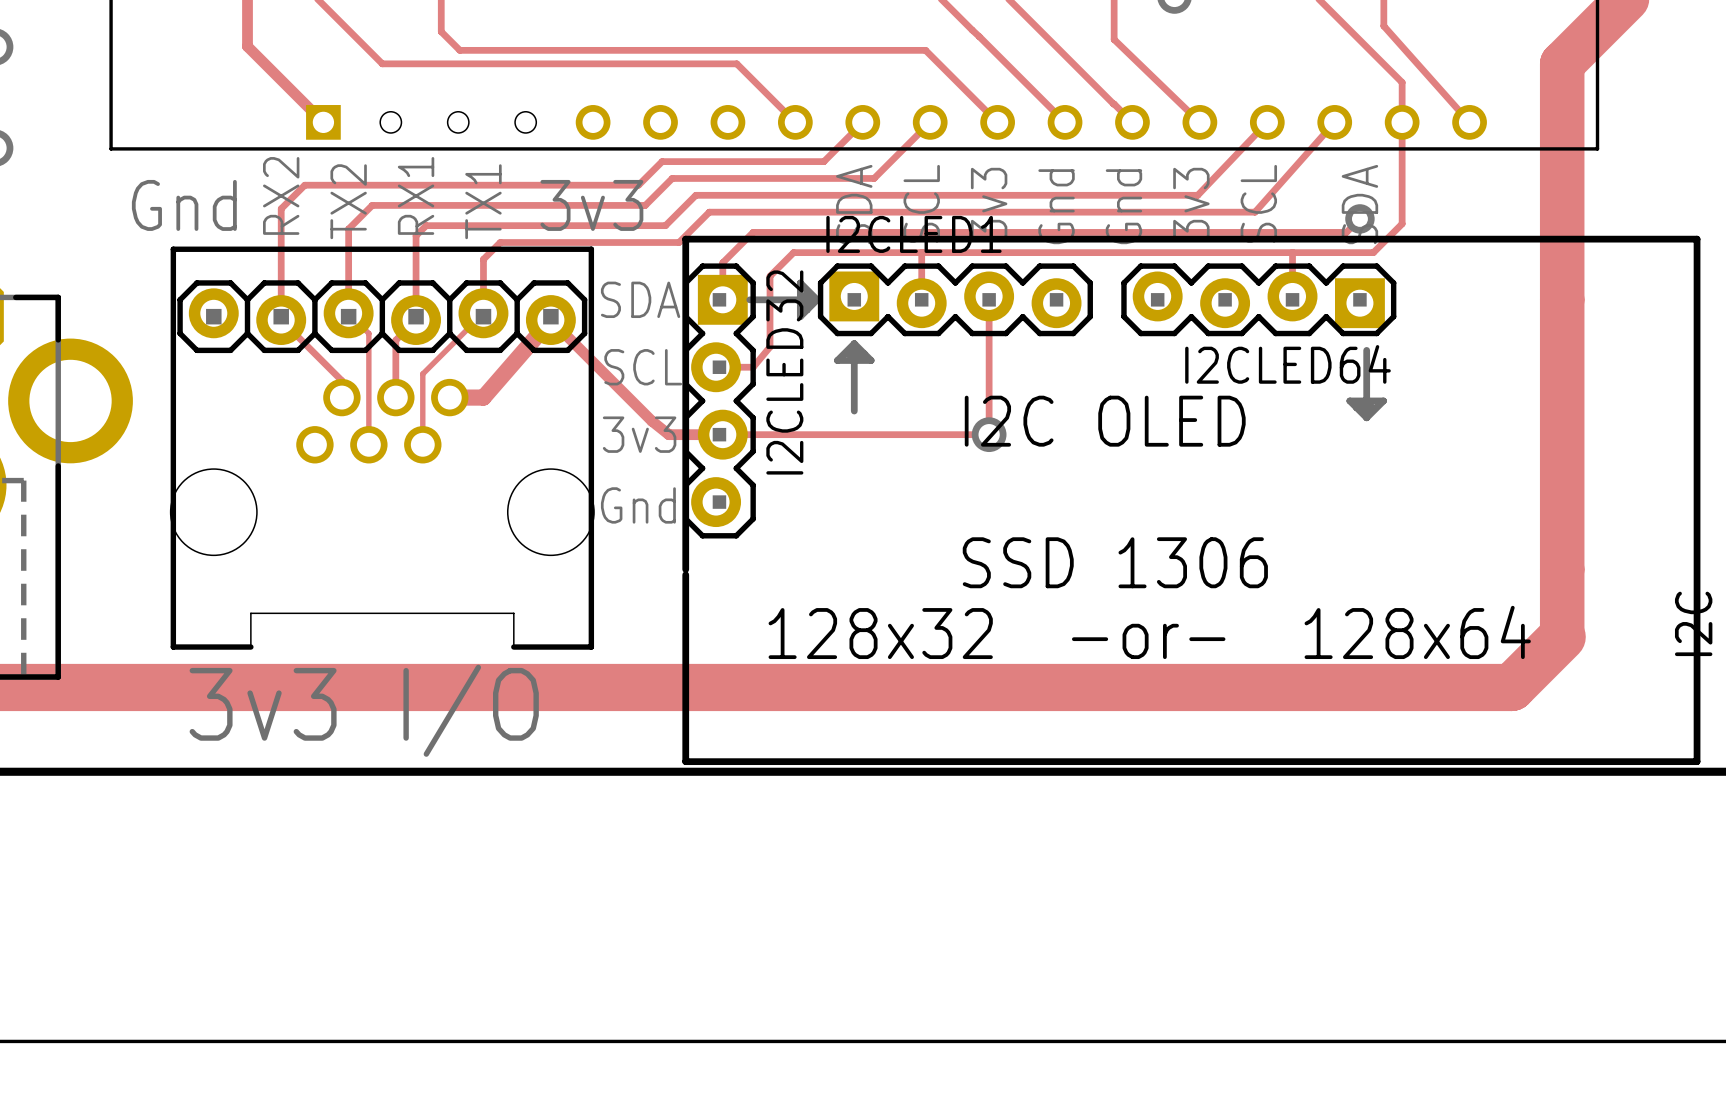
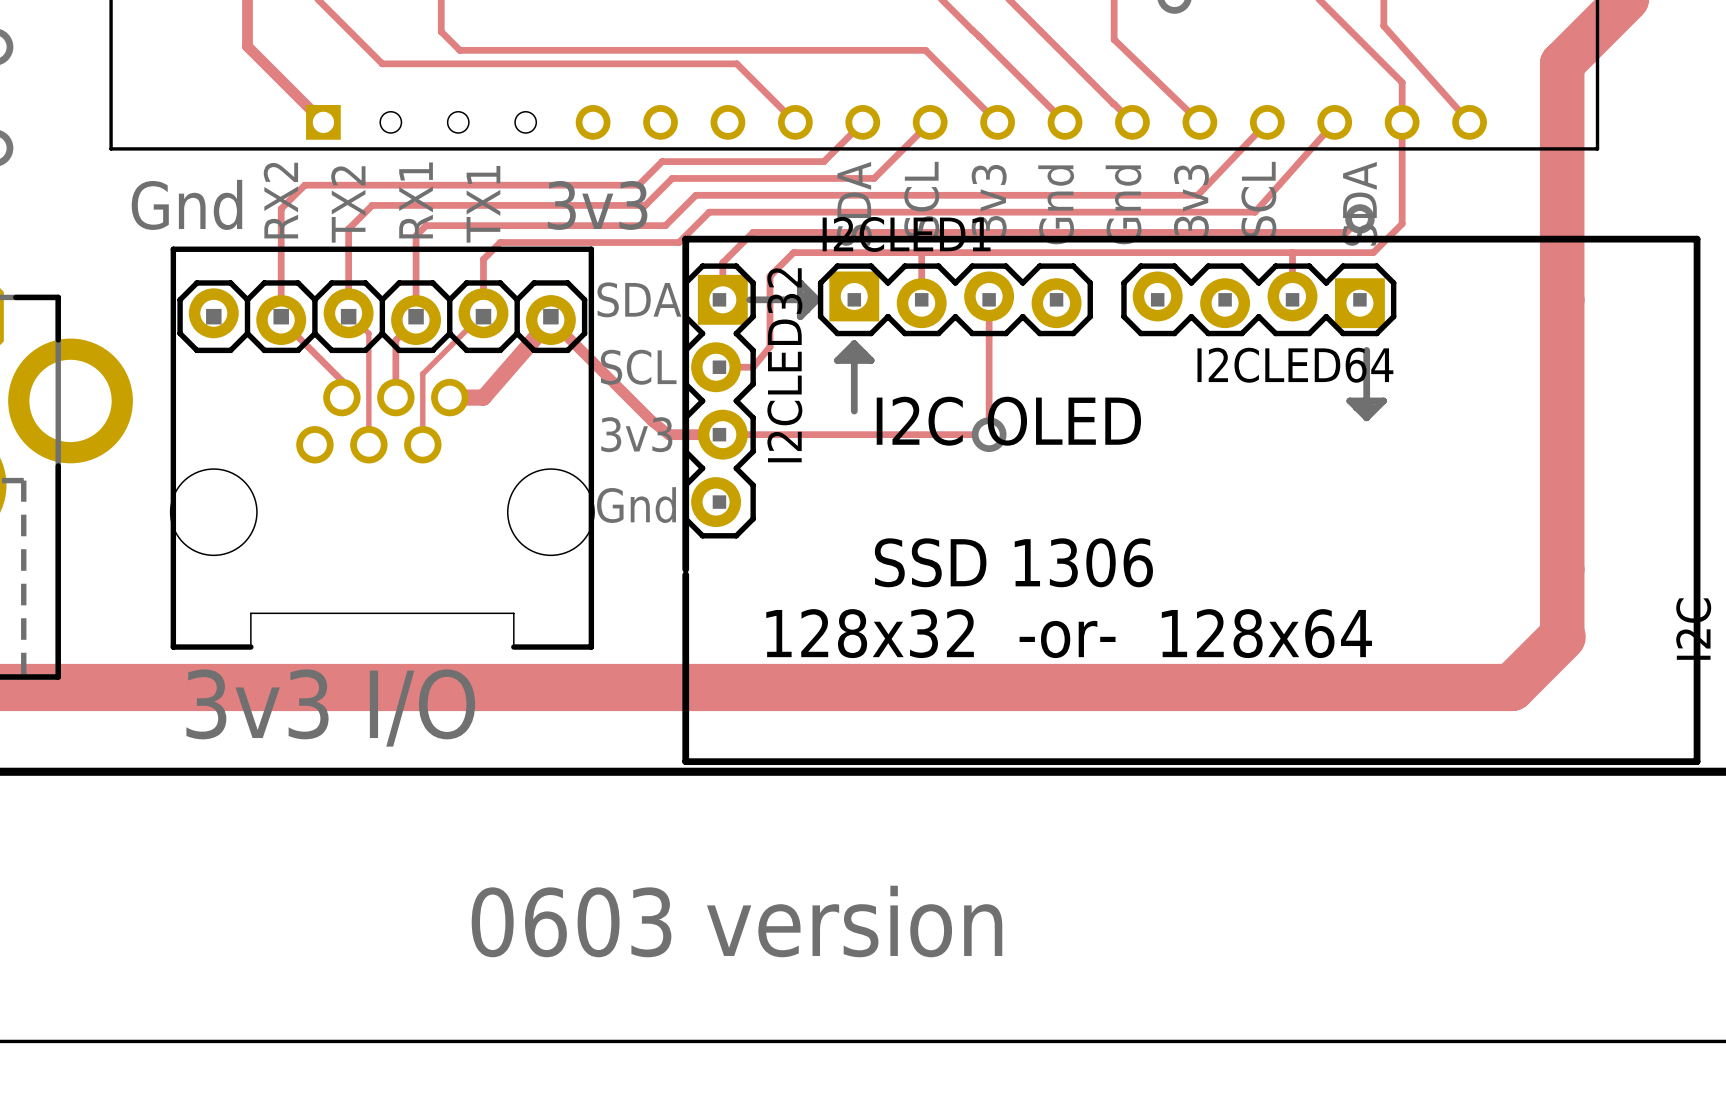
text: none -> 0603 version (736, 921)

